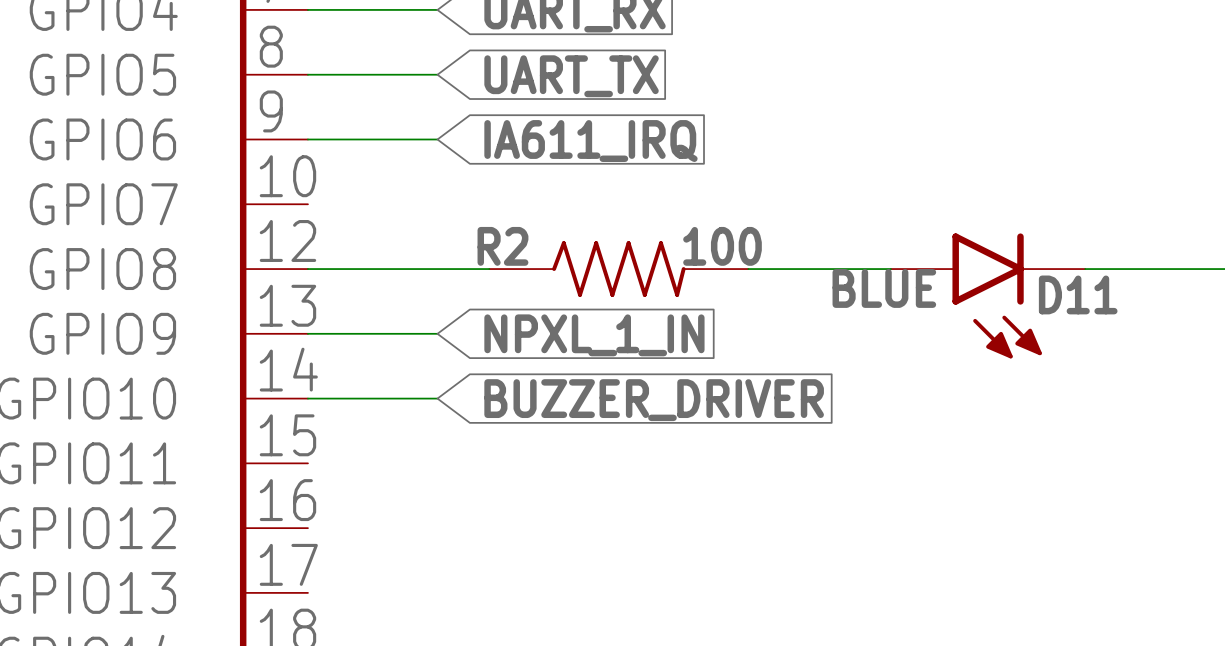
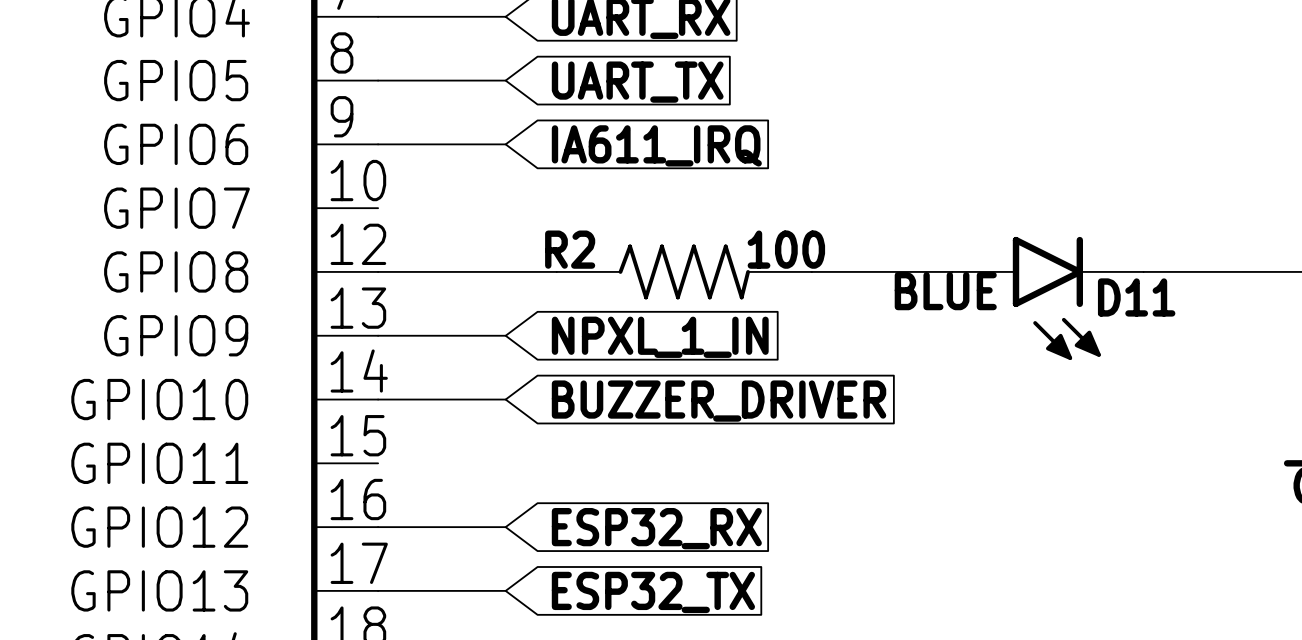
wire: none -> (378, 527) (505, 527)
global label: none -> ESP32_RX (656, 528)
wire: none -> (378, 590) (505, 590)
global label: none -> ESP32_TX (653, 592)

